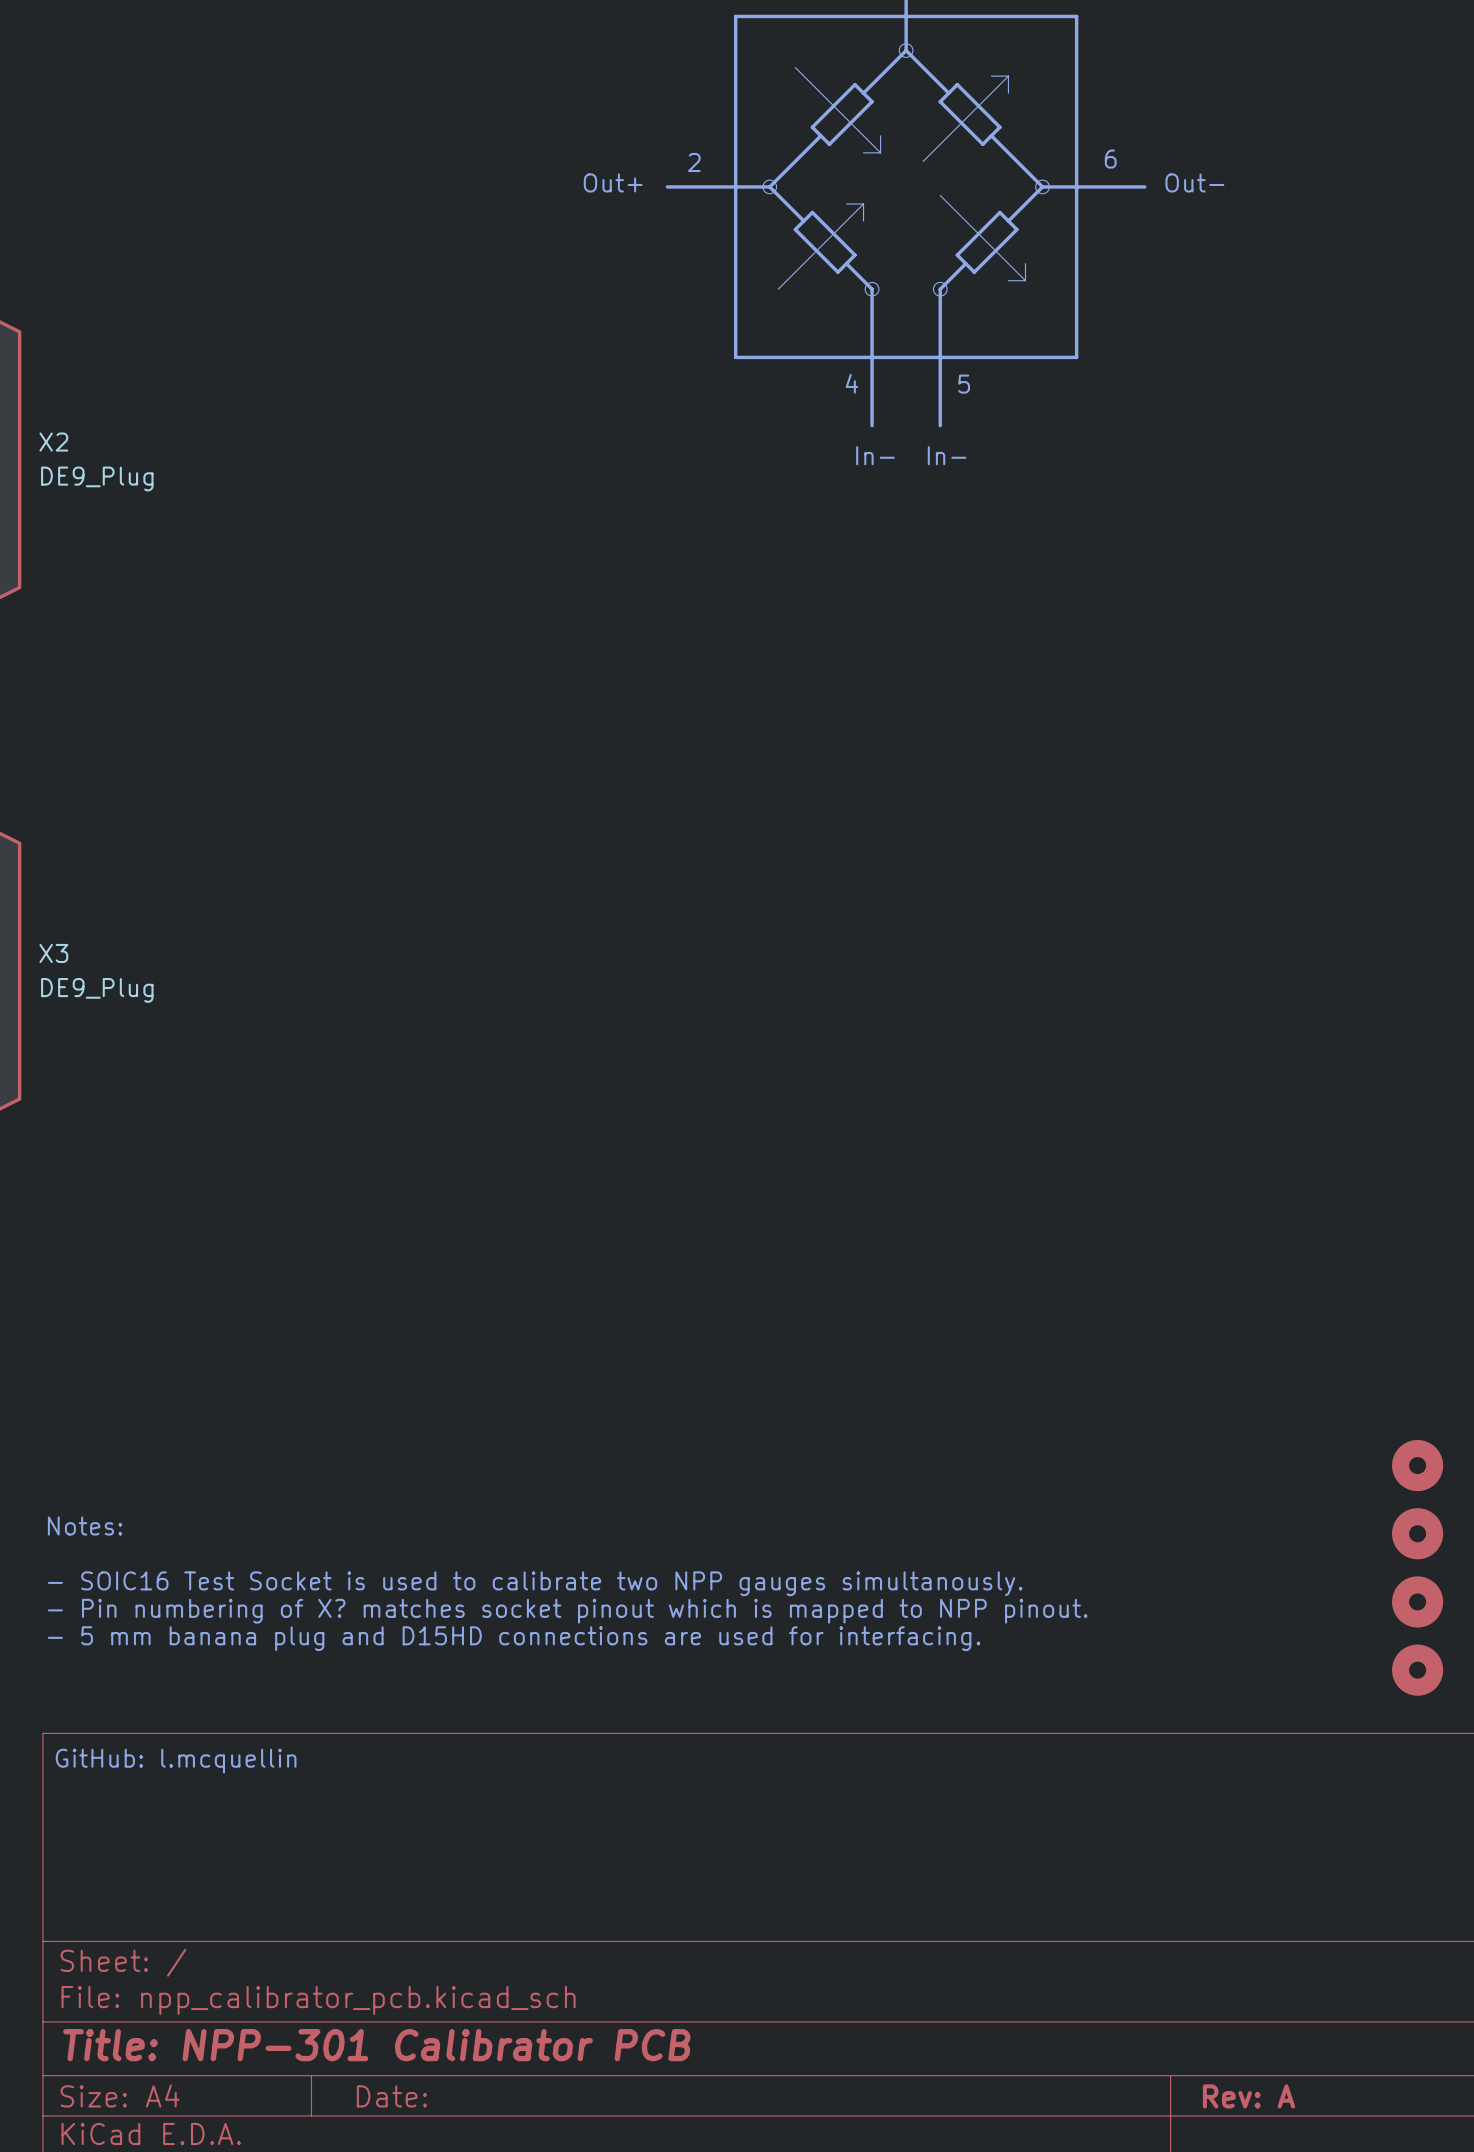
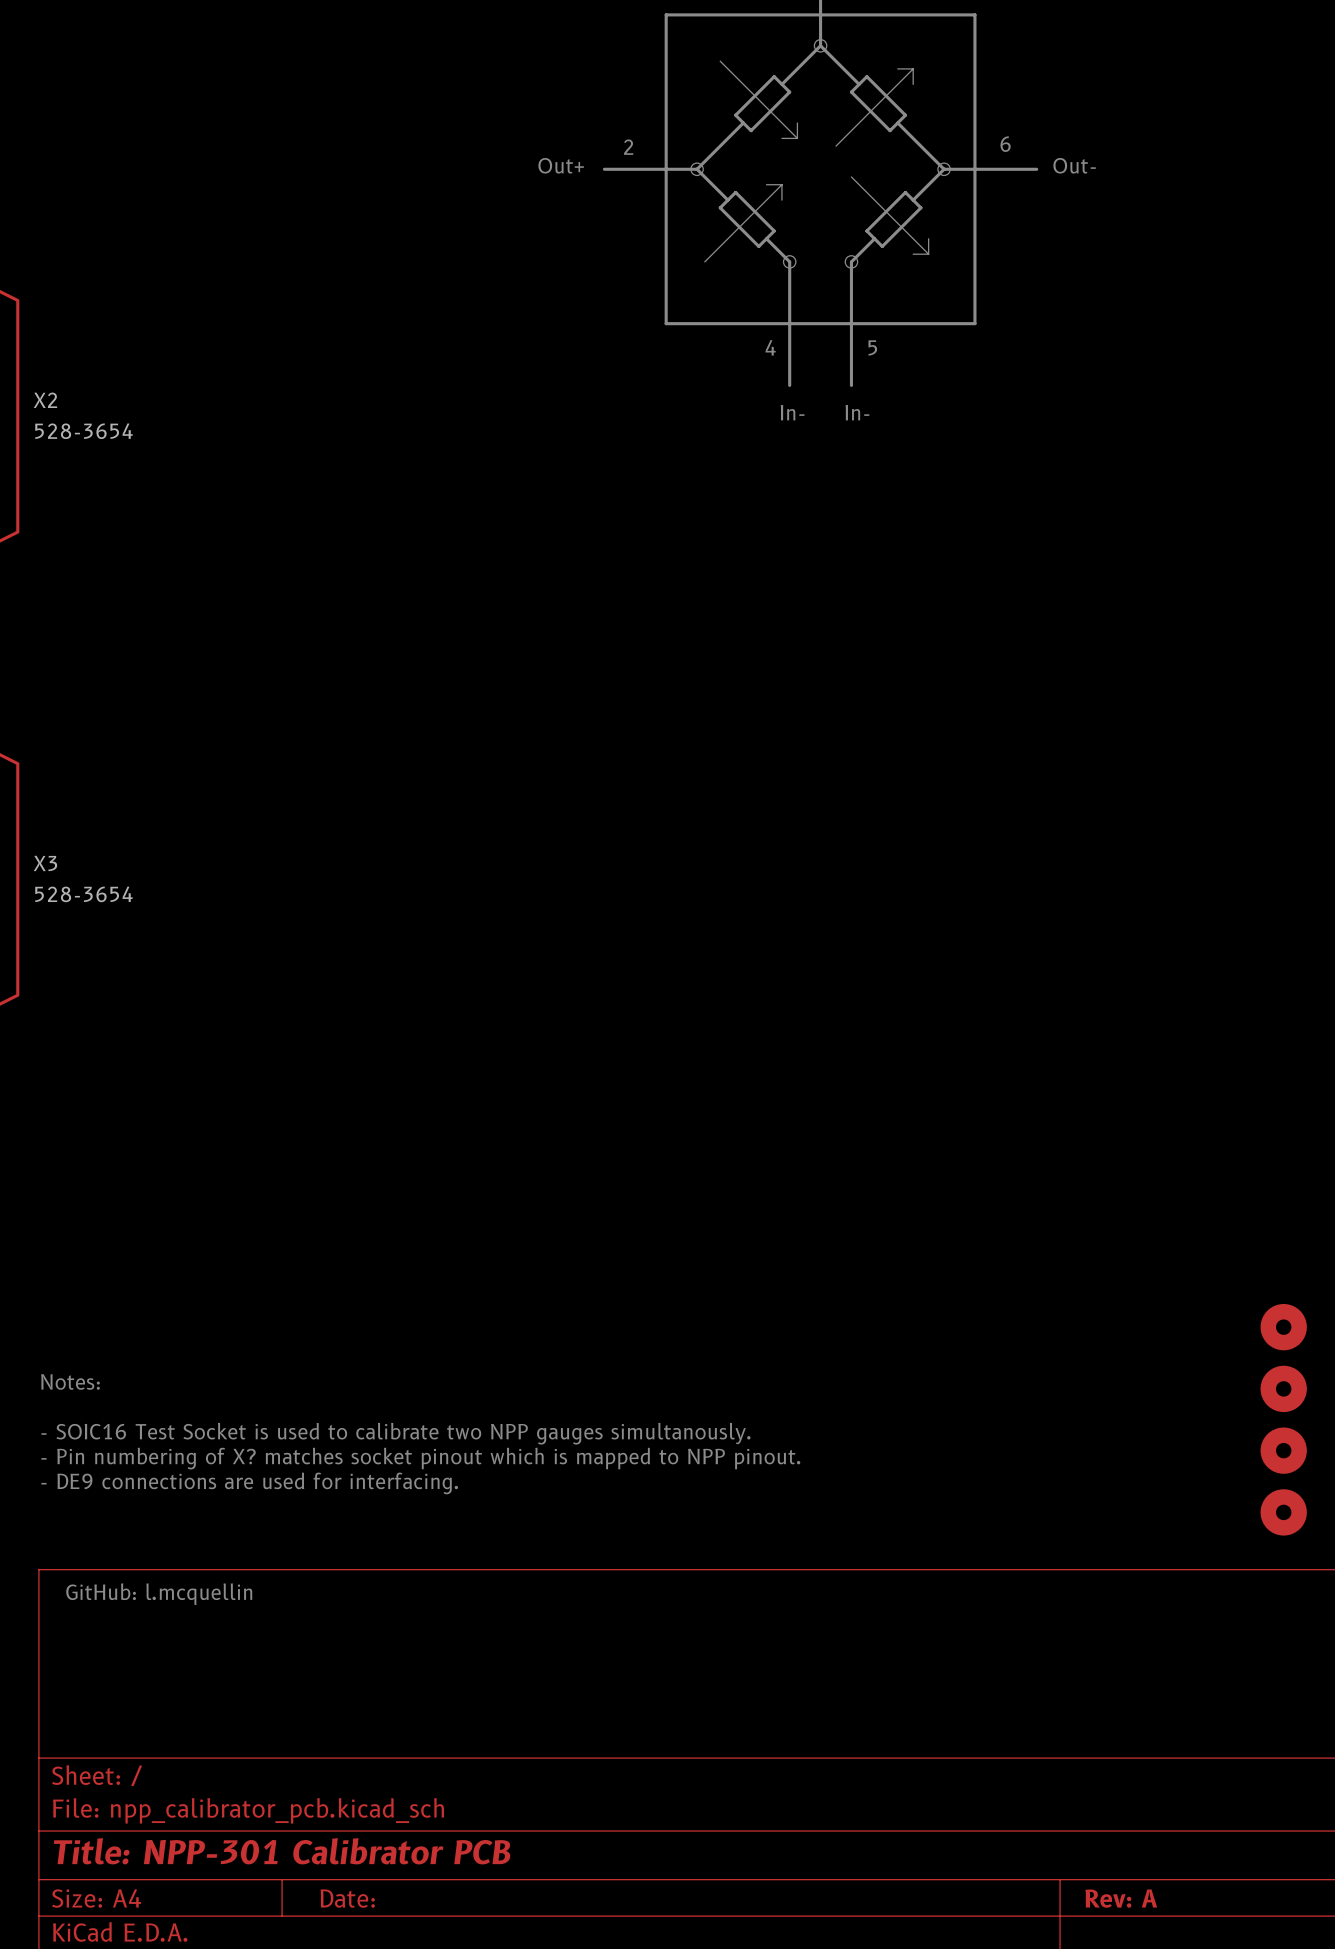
X2 value: DE9_Plug (97, 478) -> 528-3654 (84, 431)
X3 value: DE9_Plug (97, 990) -> 528-3654 (84, 894)
text: - 5 mm banana plug and D15HD connections are used for interfacing. (514, 1638) -> - DE9 connections are used for interfacing. (249, 1483)

